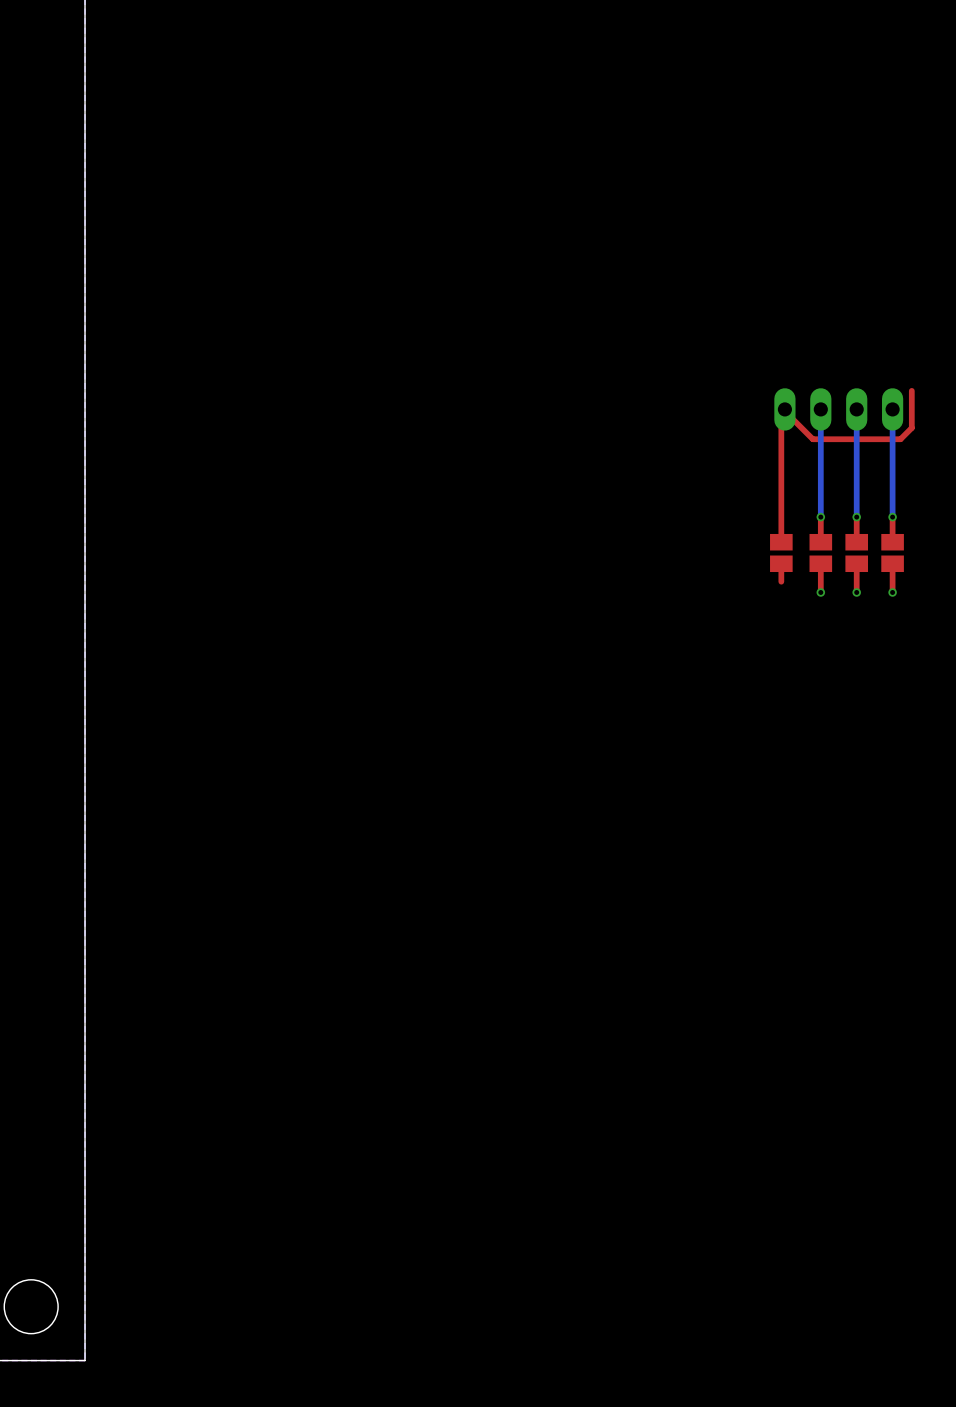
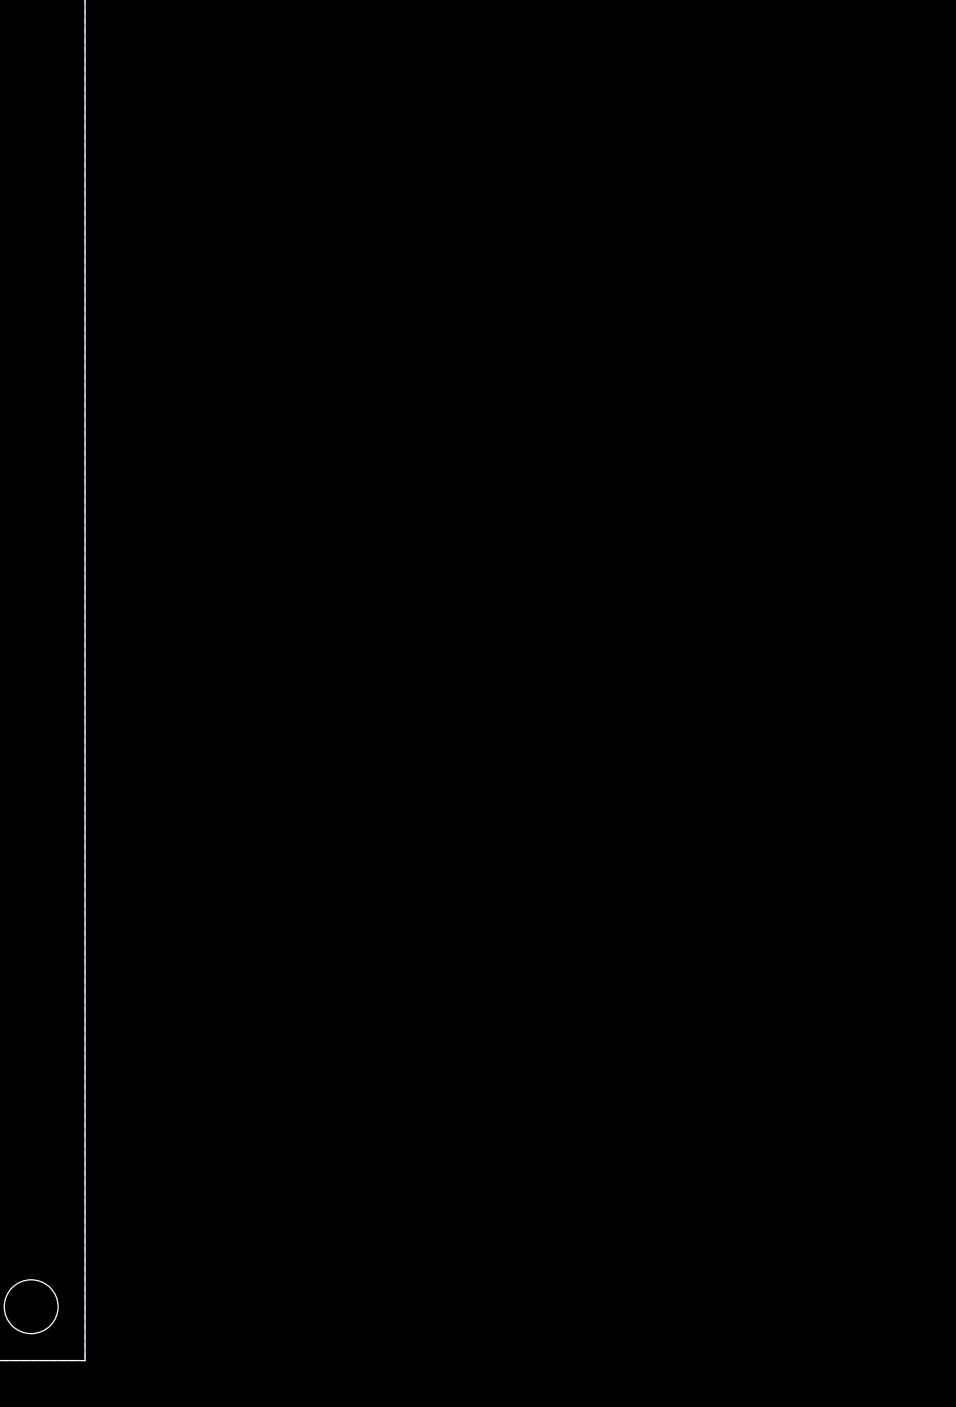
top track: (911, 390) (911, 427) (900, 439) (812, 439) (784, 411) -> none
bottom track: (820, 409) (820, 517) -> none
part: (838, 409) -> none
bottom track: (856, 409) (856, 517) -> none
bottom track: (892, 409) (892, 517) -> none
top track: (784, 411) (781, 414) (781, 542) -> none
top track: (820, 517) (820, 542) -> none
via: (820, 517) -> none
top track: (856, 517) (856, 542) -> none
via: (856, 517) -> none
top track: (892, 517) (892, 542) -> none
via: (892, 517) -> none
part: (781, 552) -> none
part: (820, 552) -> none
part: (856, 552) -> none
part: (892, 552) -> none
top track: (781, 563) (781, 581) -> none
top track: (820, 563) (820, 592) -> none
top track: (856, 563) (856, 592) -> none
top track: (892, 563) (892, 592) -> none
via: (820, 592) -> none
via: (856, 592) -> none
via: (892, 592) -> none

